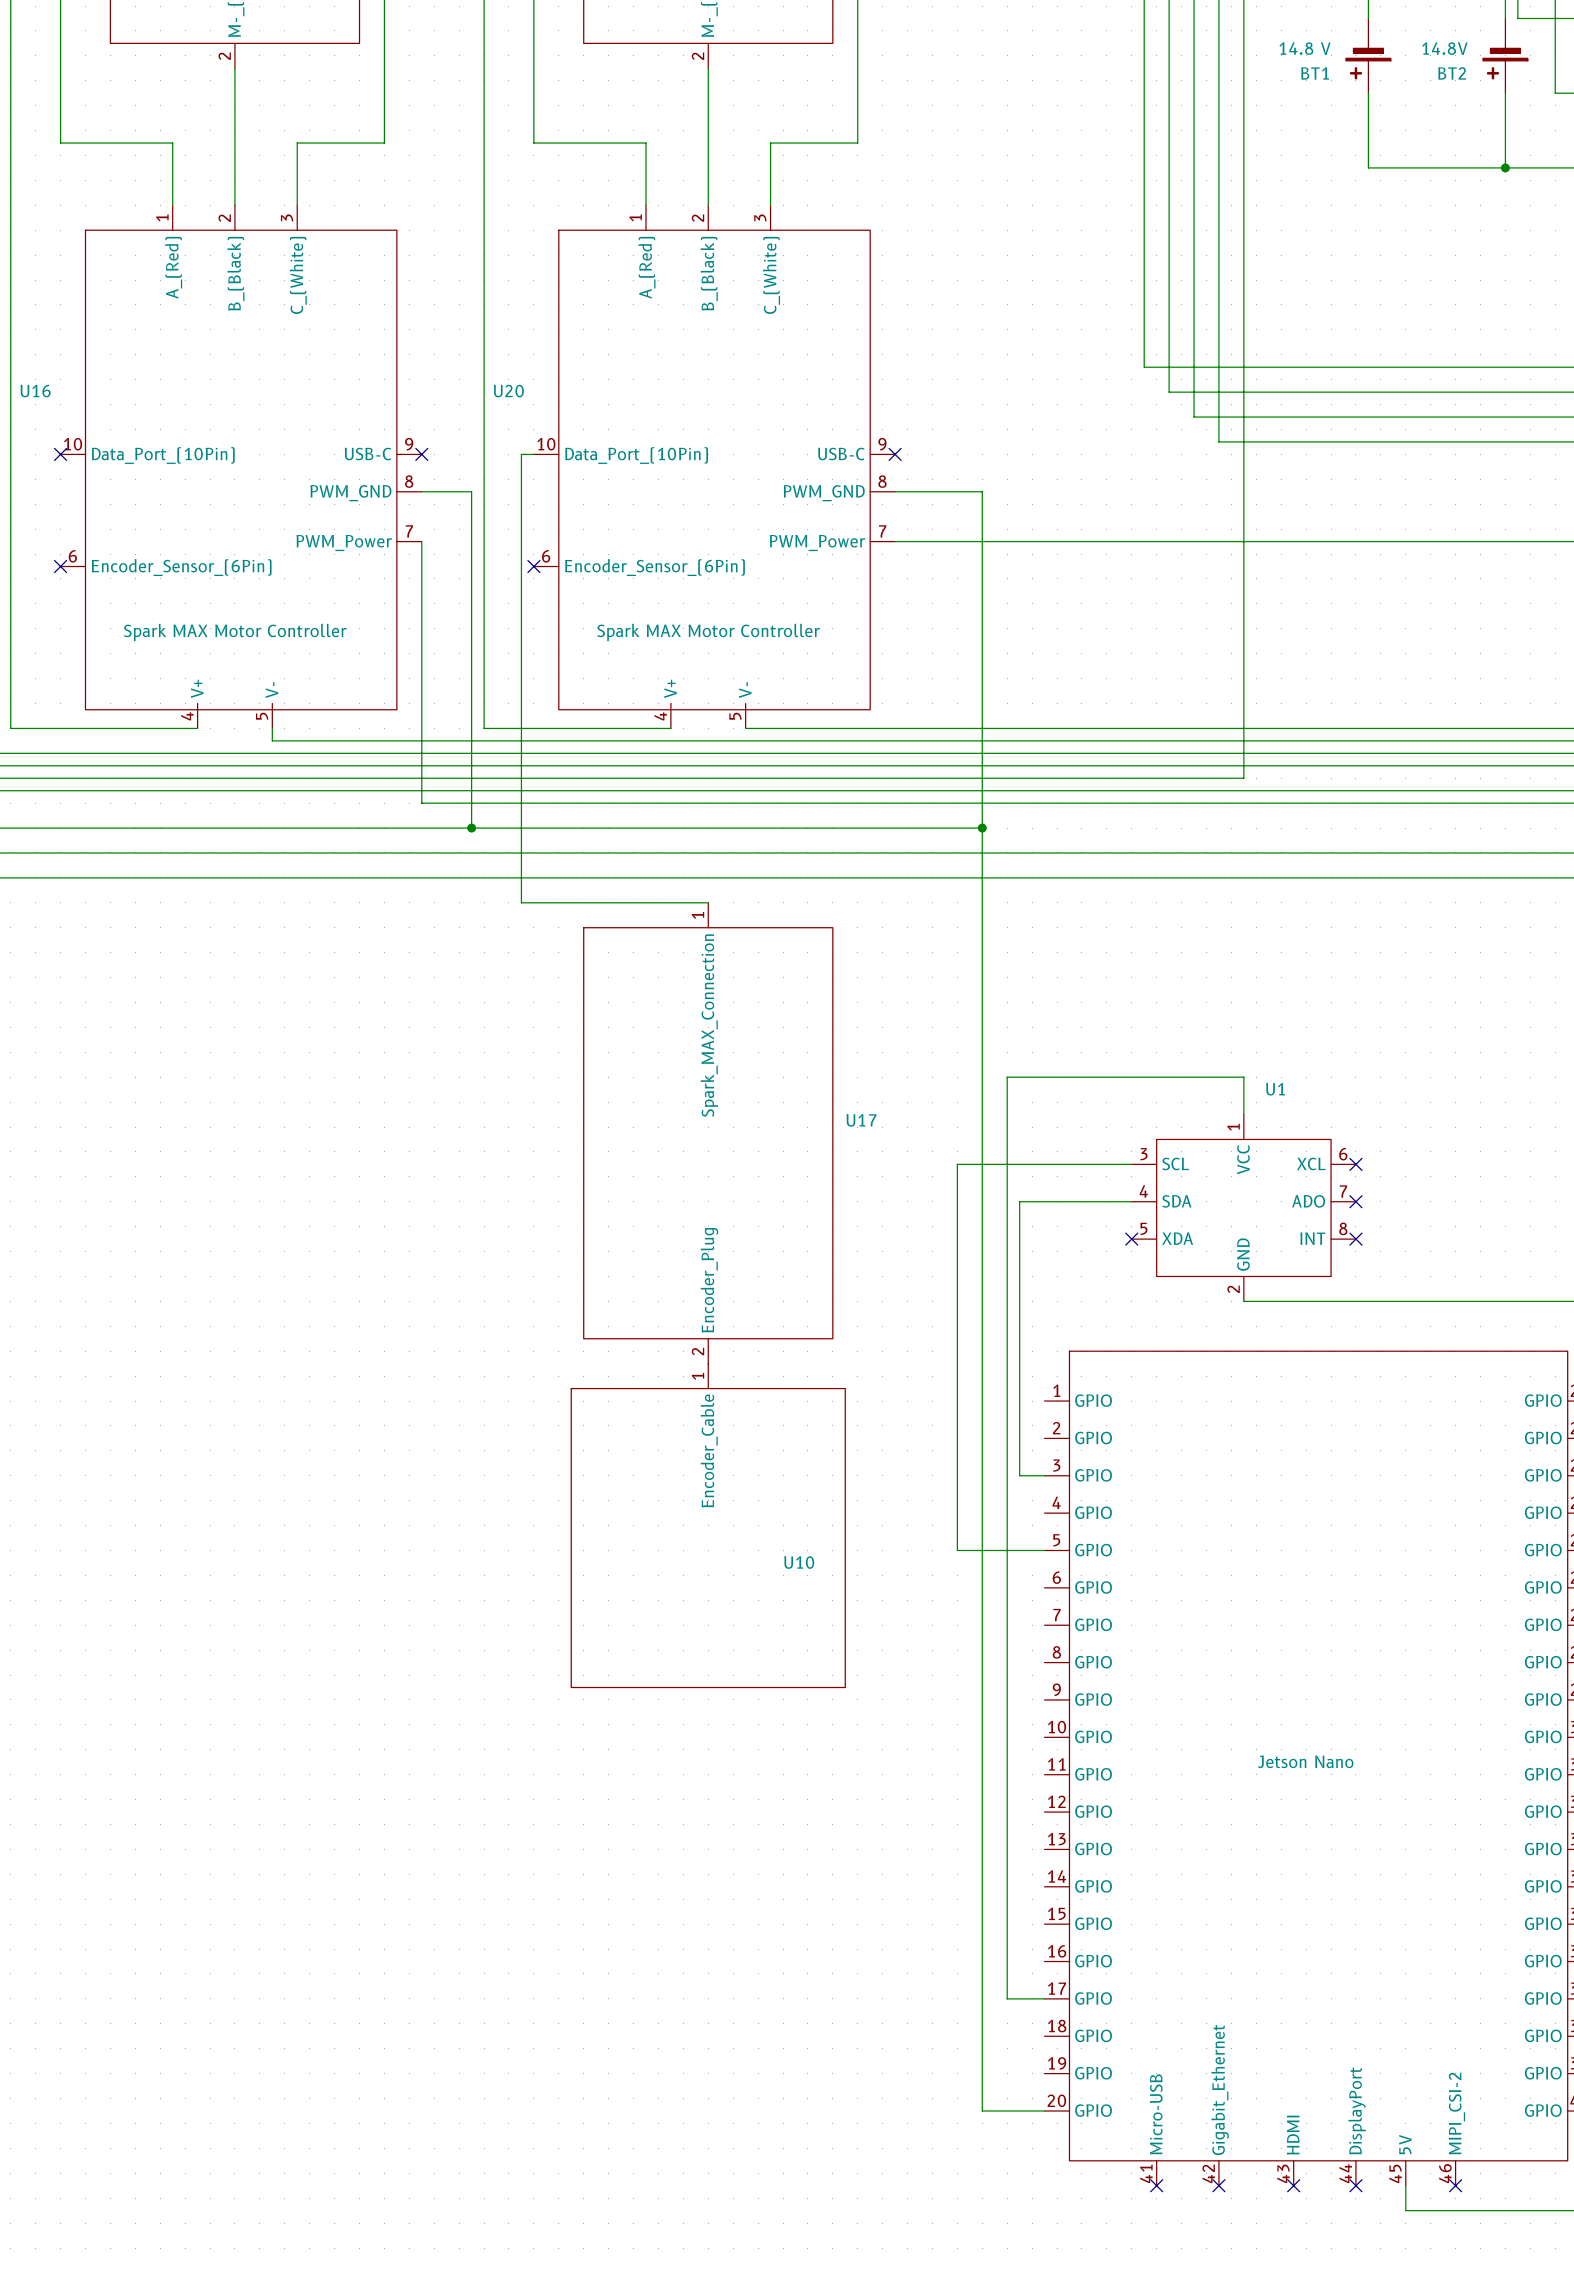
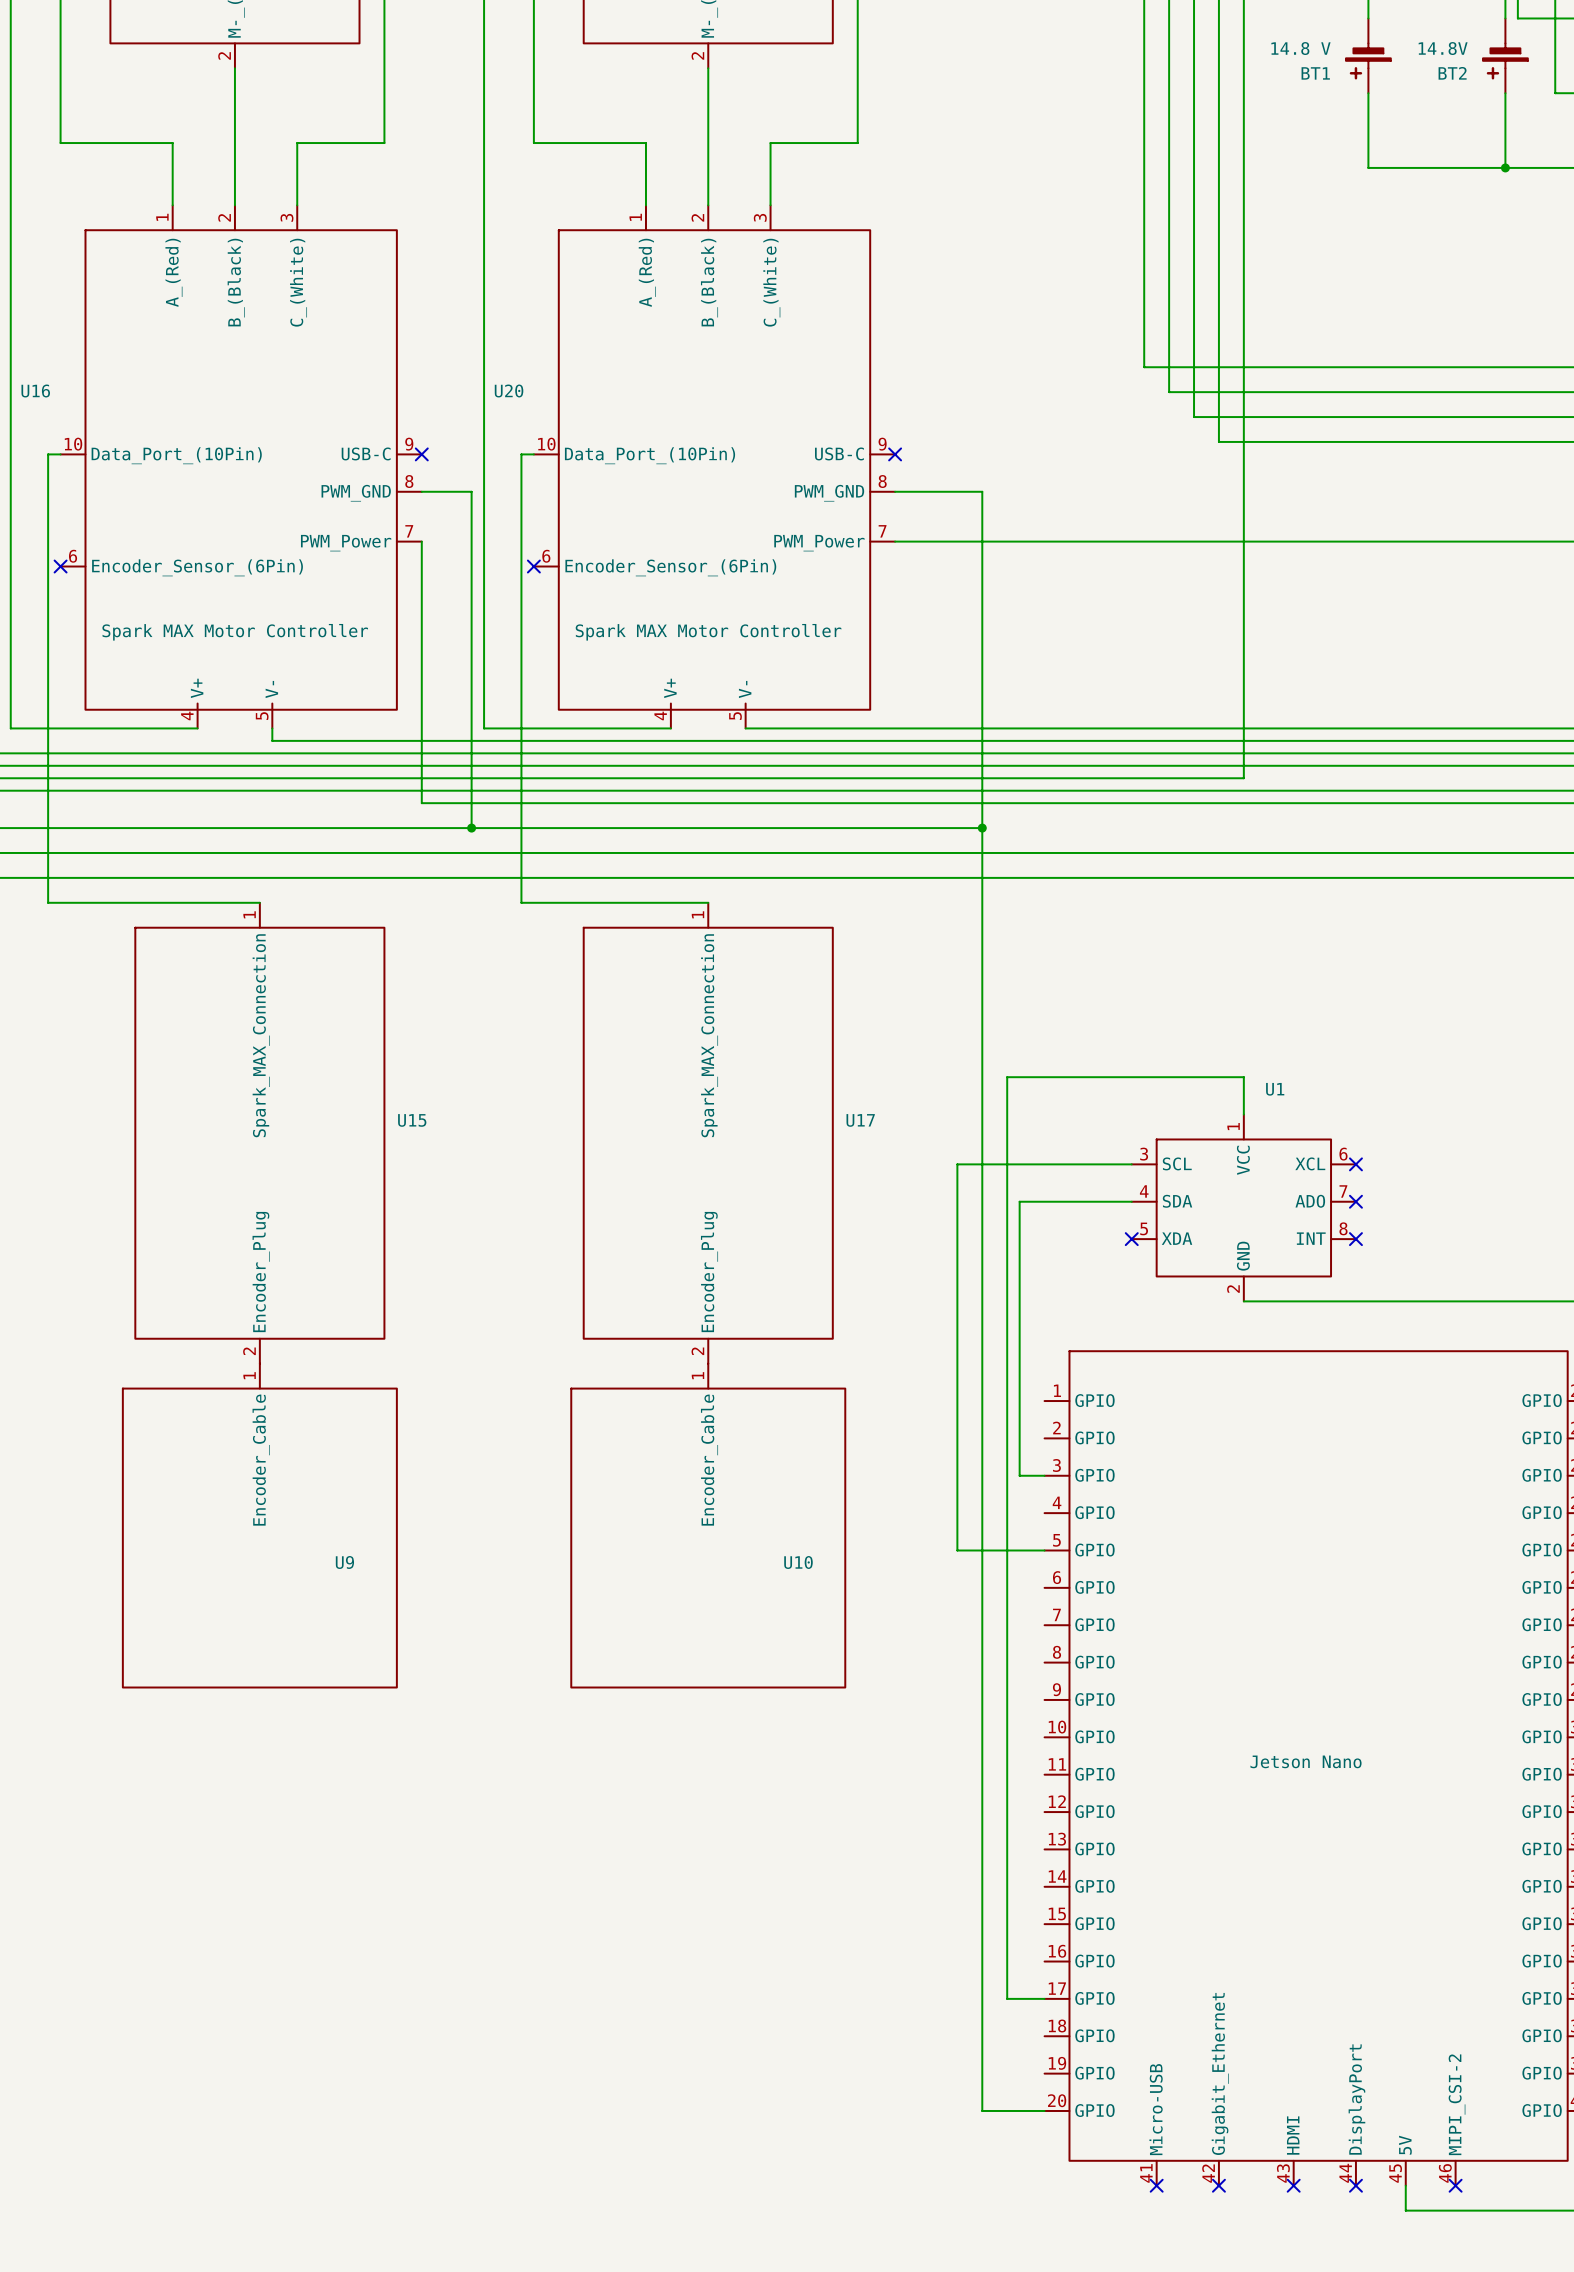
wire: none -> (60, 454) (48, 454) (48, 902) (259, 902)
no-connect mark: (60, 454) -> none
U15: none -> (259, 1133)
U9: none -> (259, 1525)

